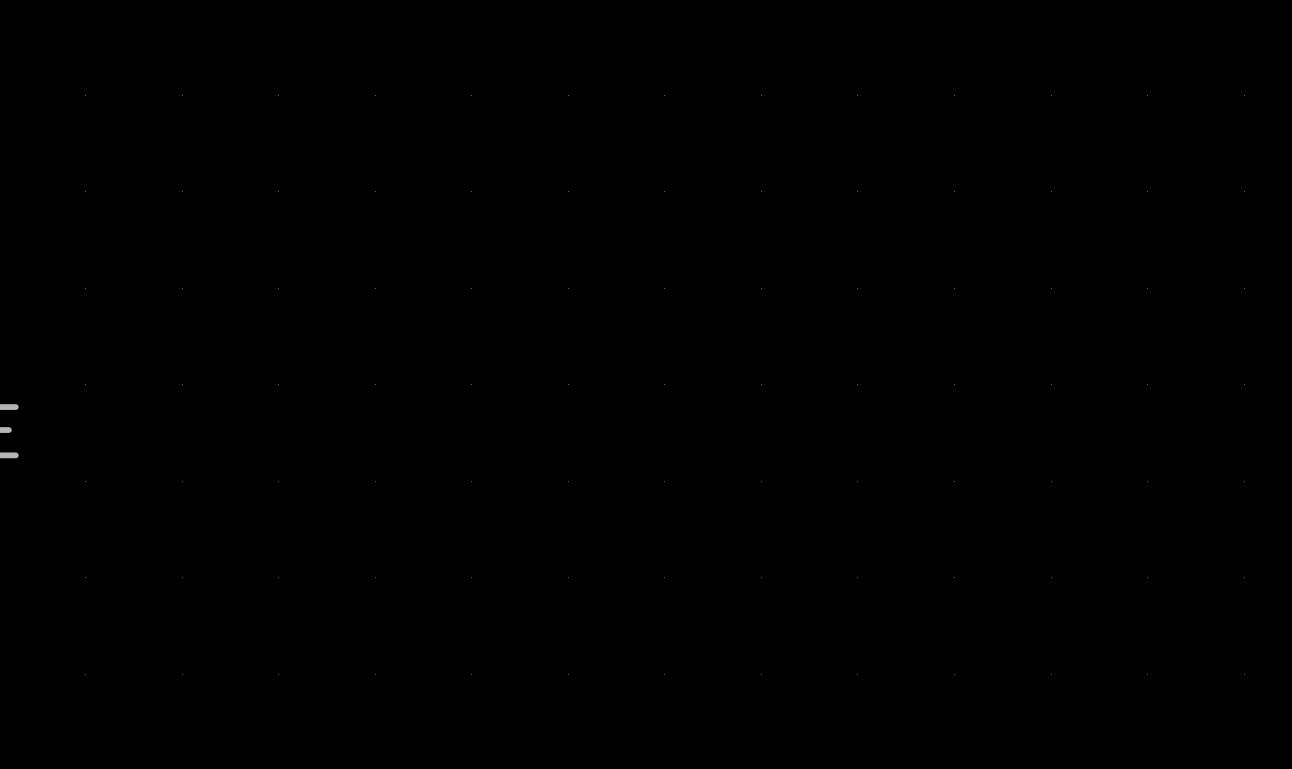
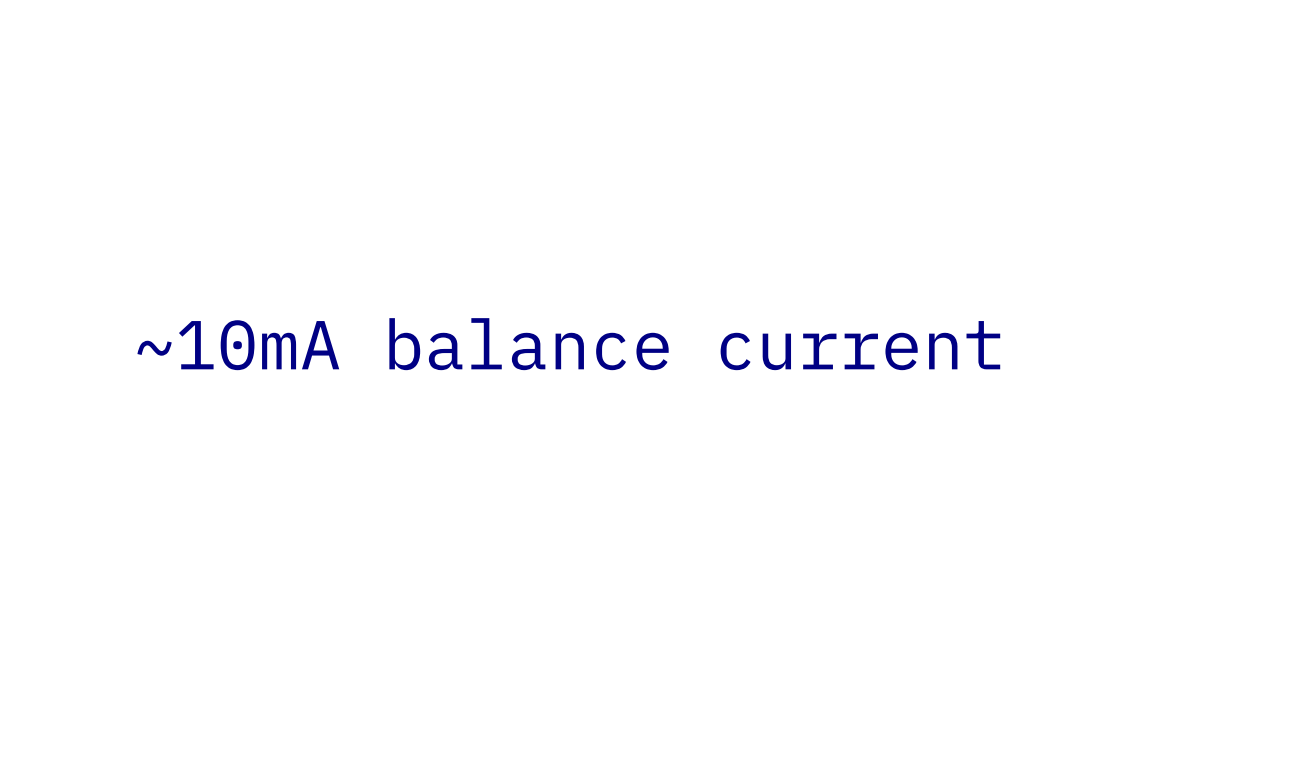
text: none -> ~10mA balance current (568, 344)

